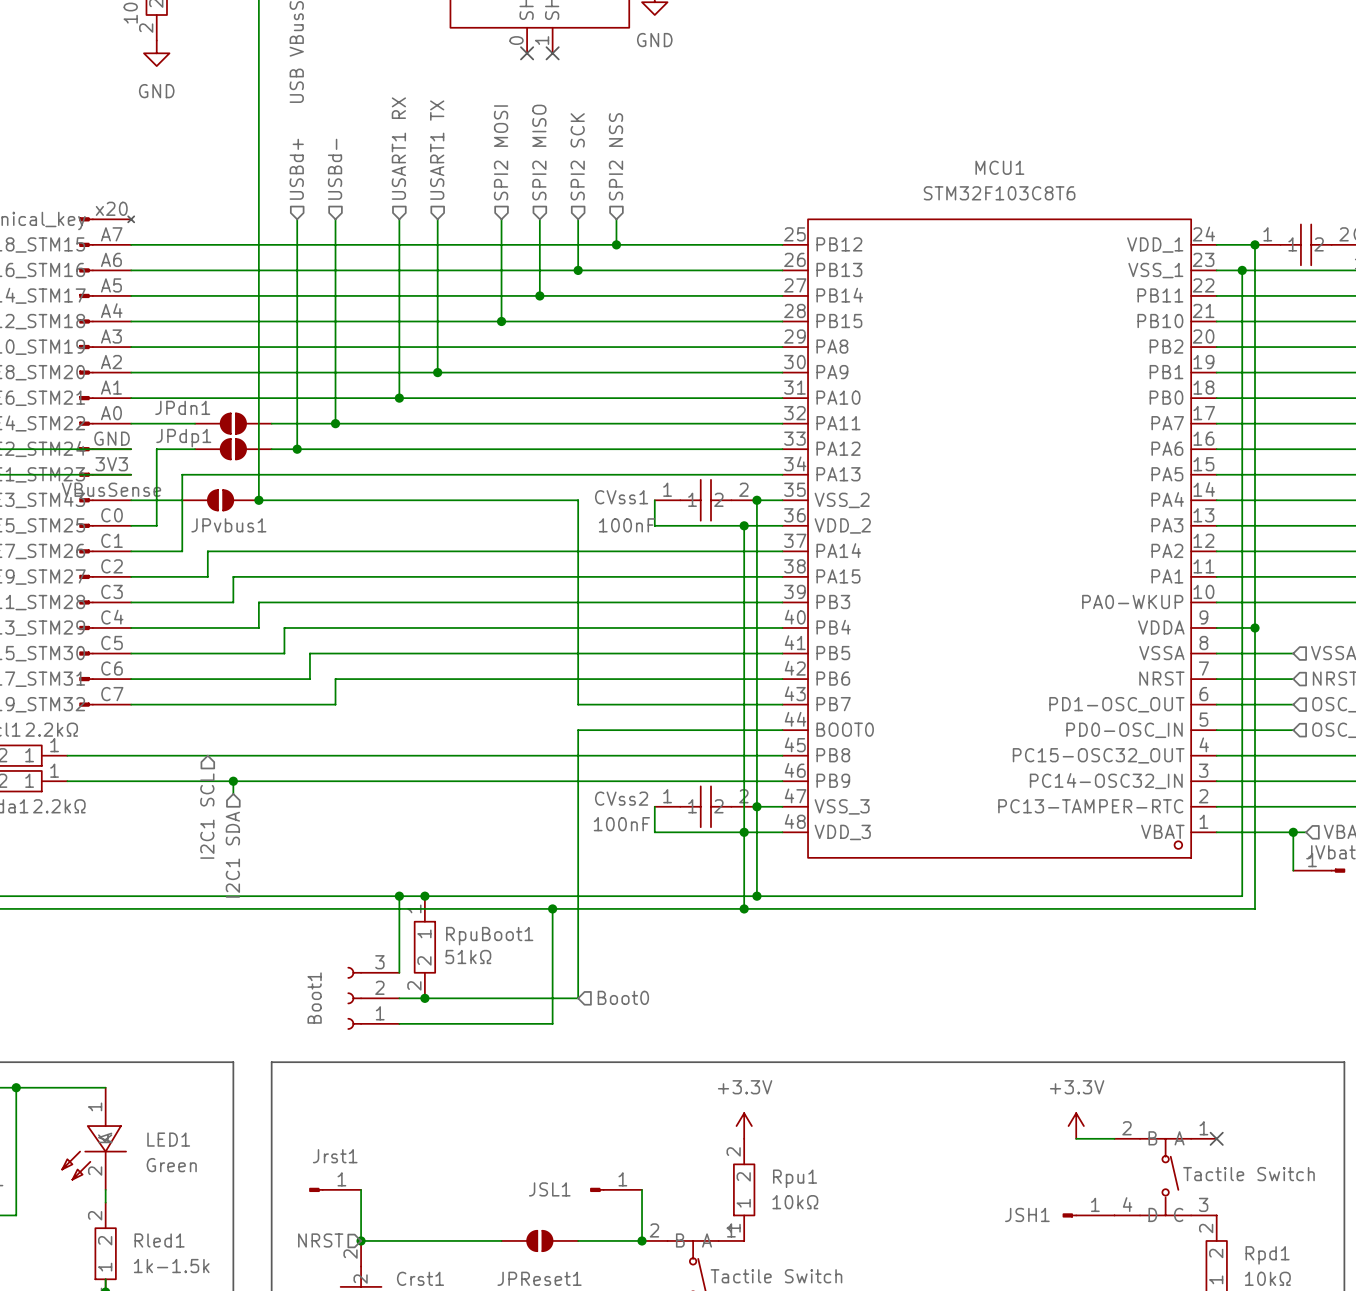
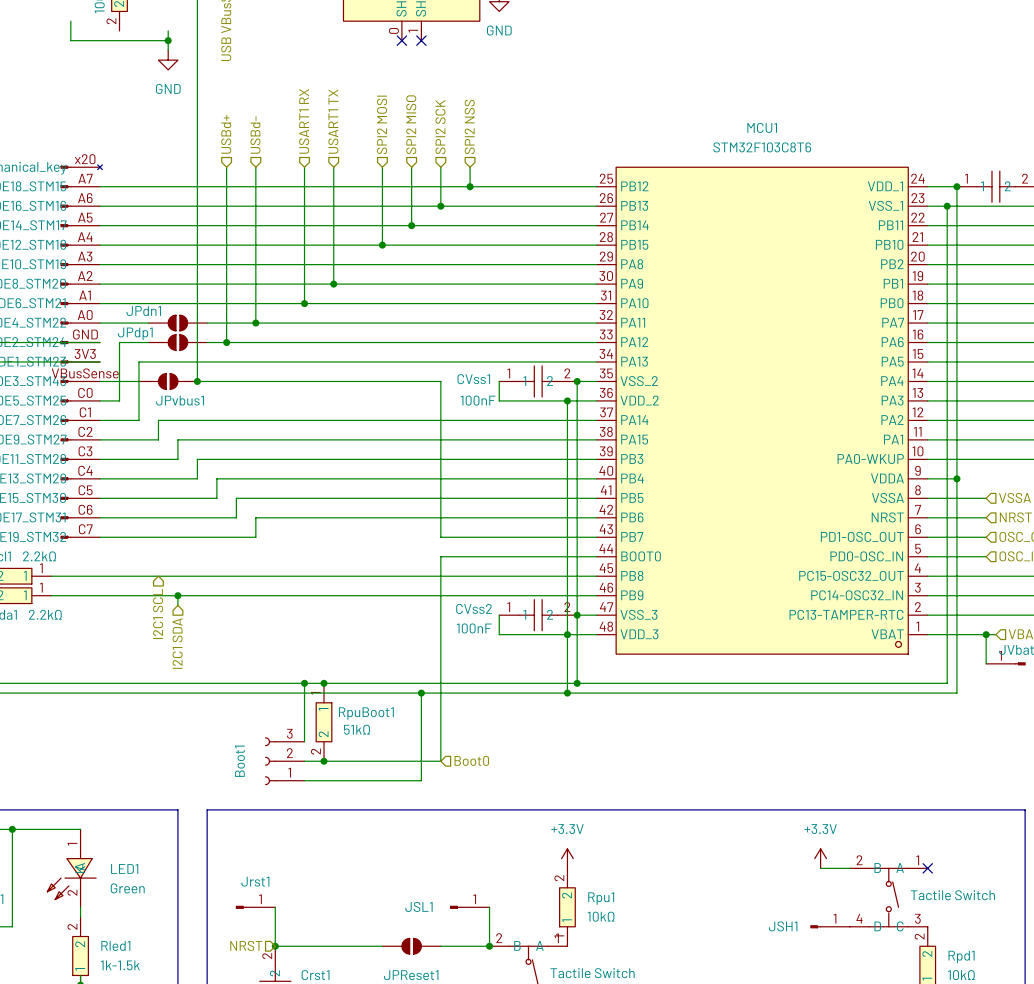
wire: none -> (70, 21) (70, 40) (168, 40)
wire: none -> (168, 30) (168, 50)
power symbol position: GND (156, 53) -> GND (168, 60)
junction: none -> (168, 40)

